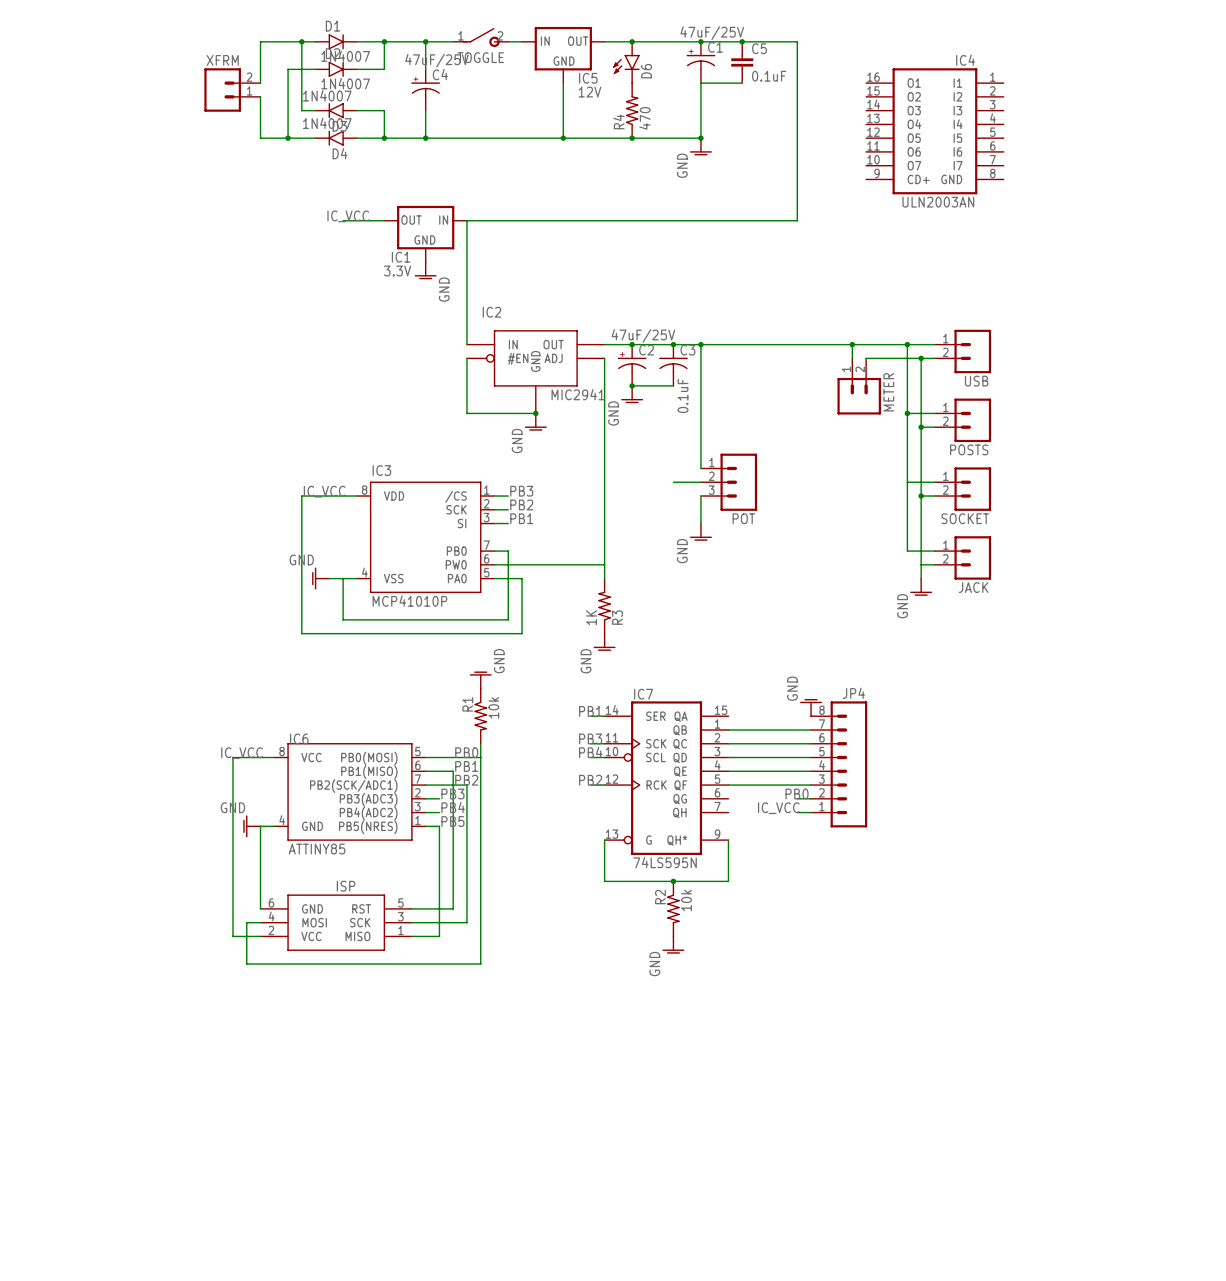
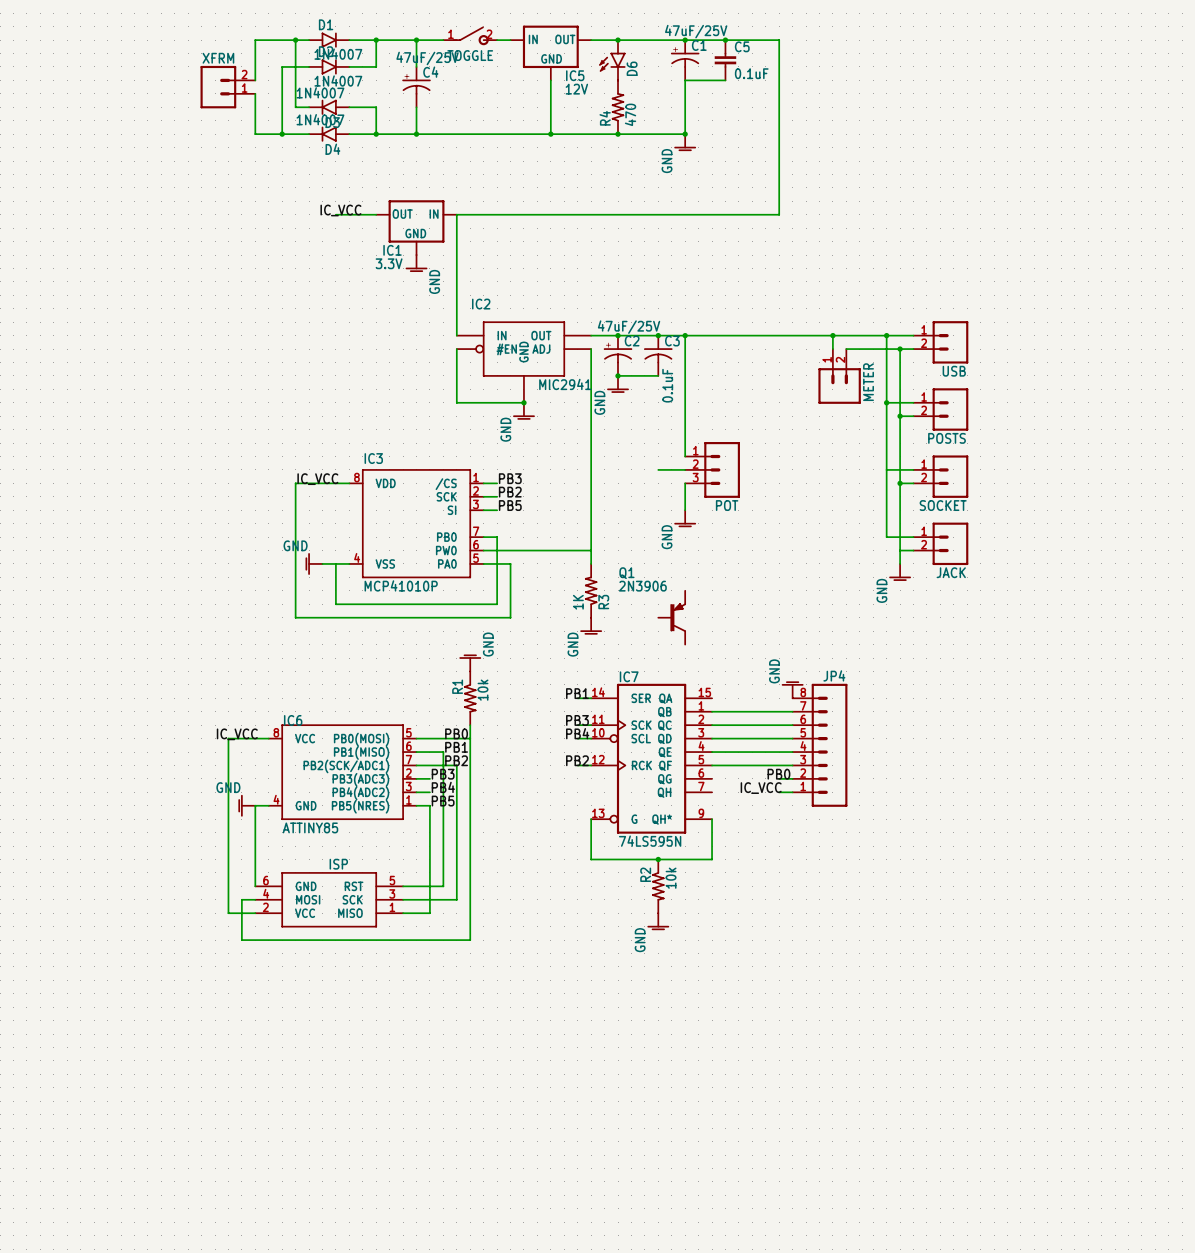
IC4: ULN2003AN (934, 131) -> none
label: PB1 (521, 518) -> PB5 (510, 505)
Q1: none -> 2N3906 (671, 617)

